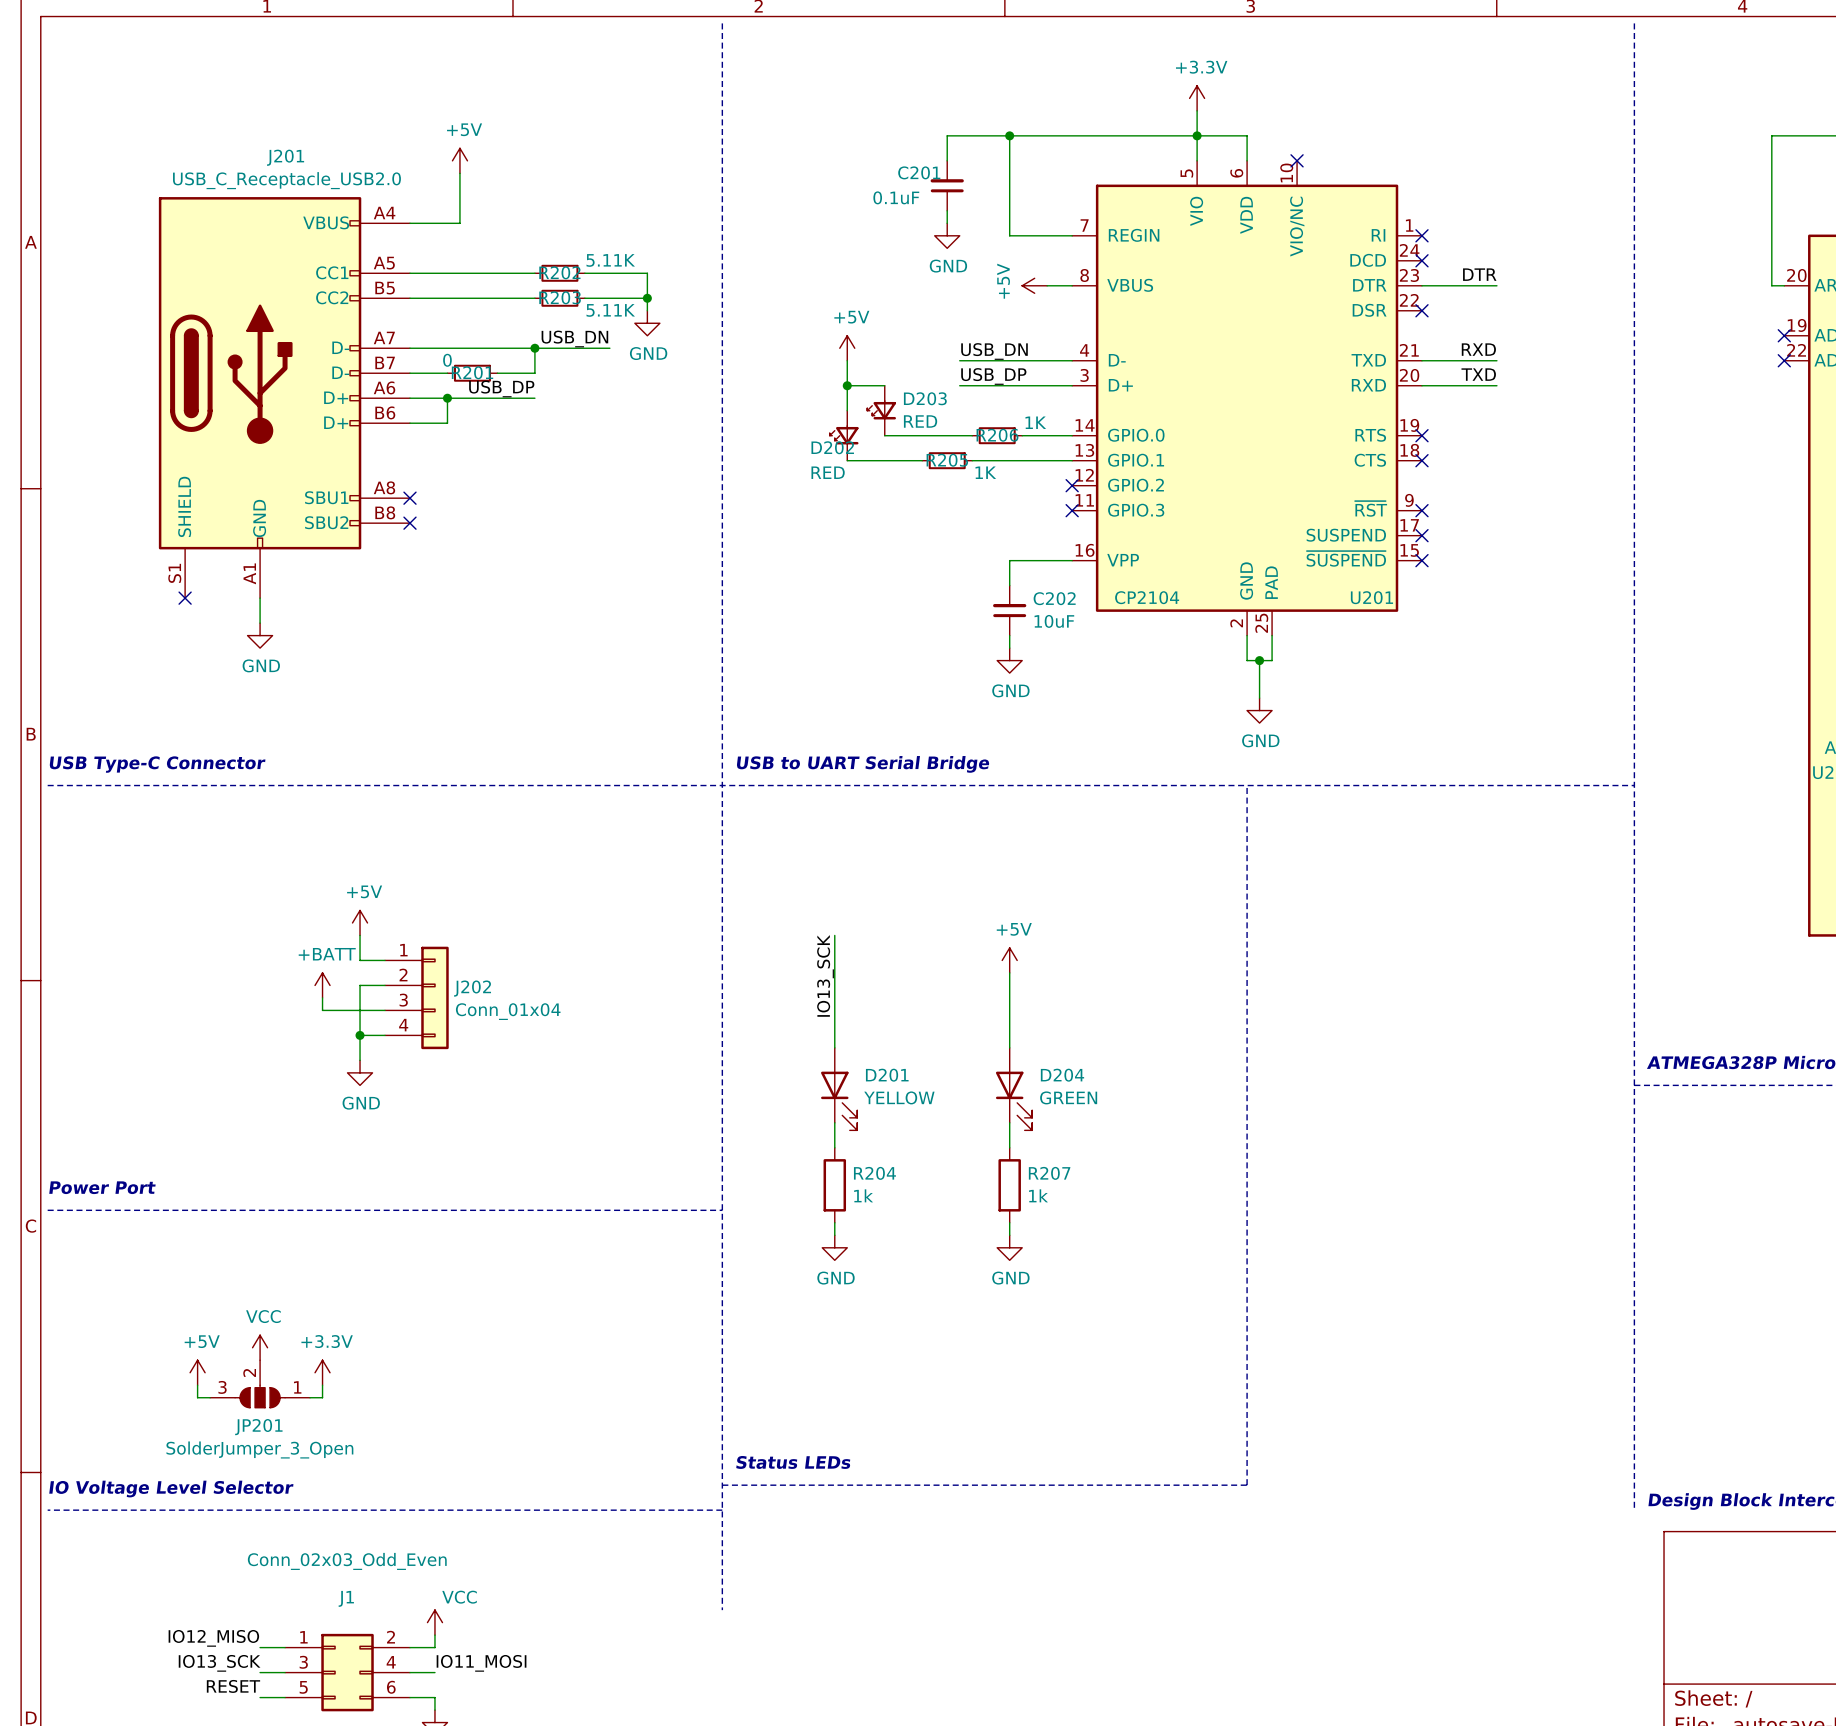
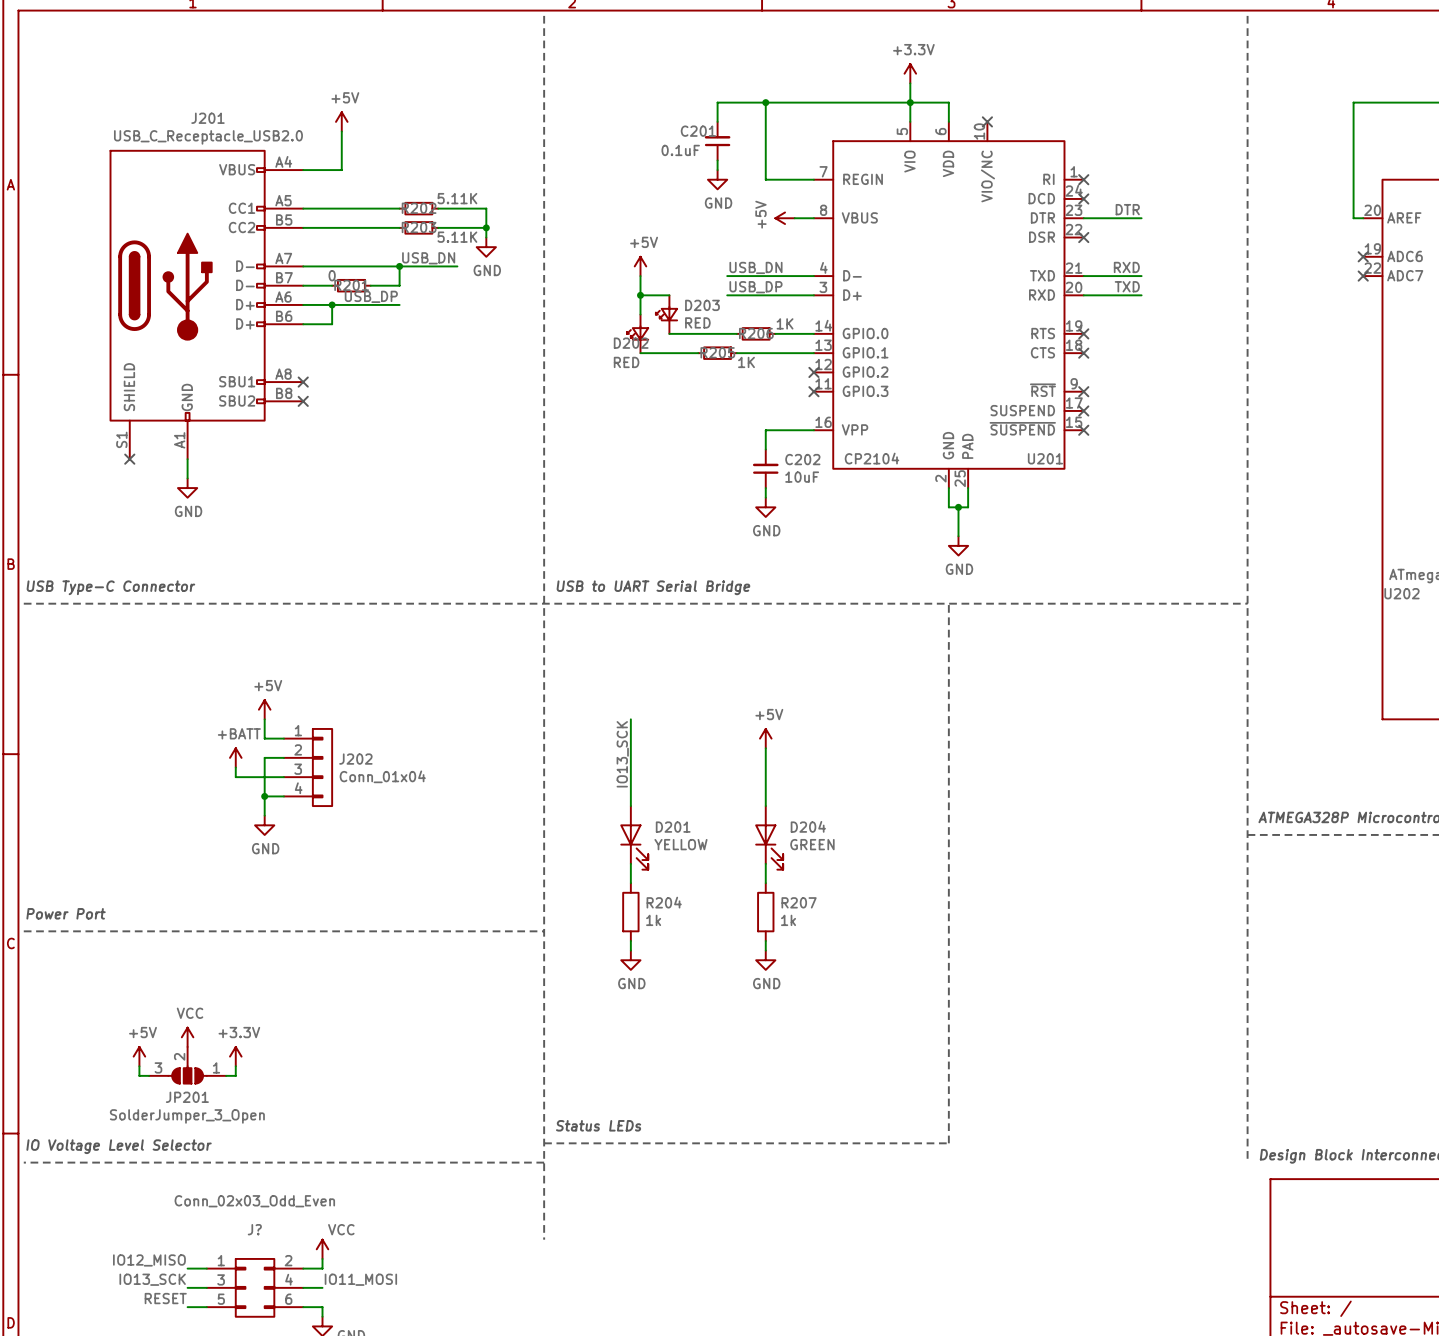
J1 name: J1 (346, 1598) -> J? (254, 1229)

